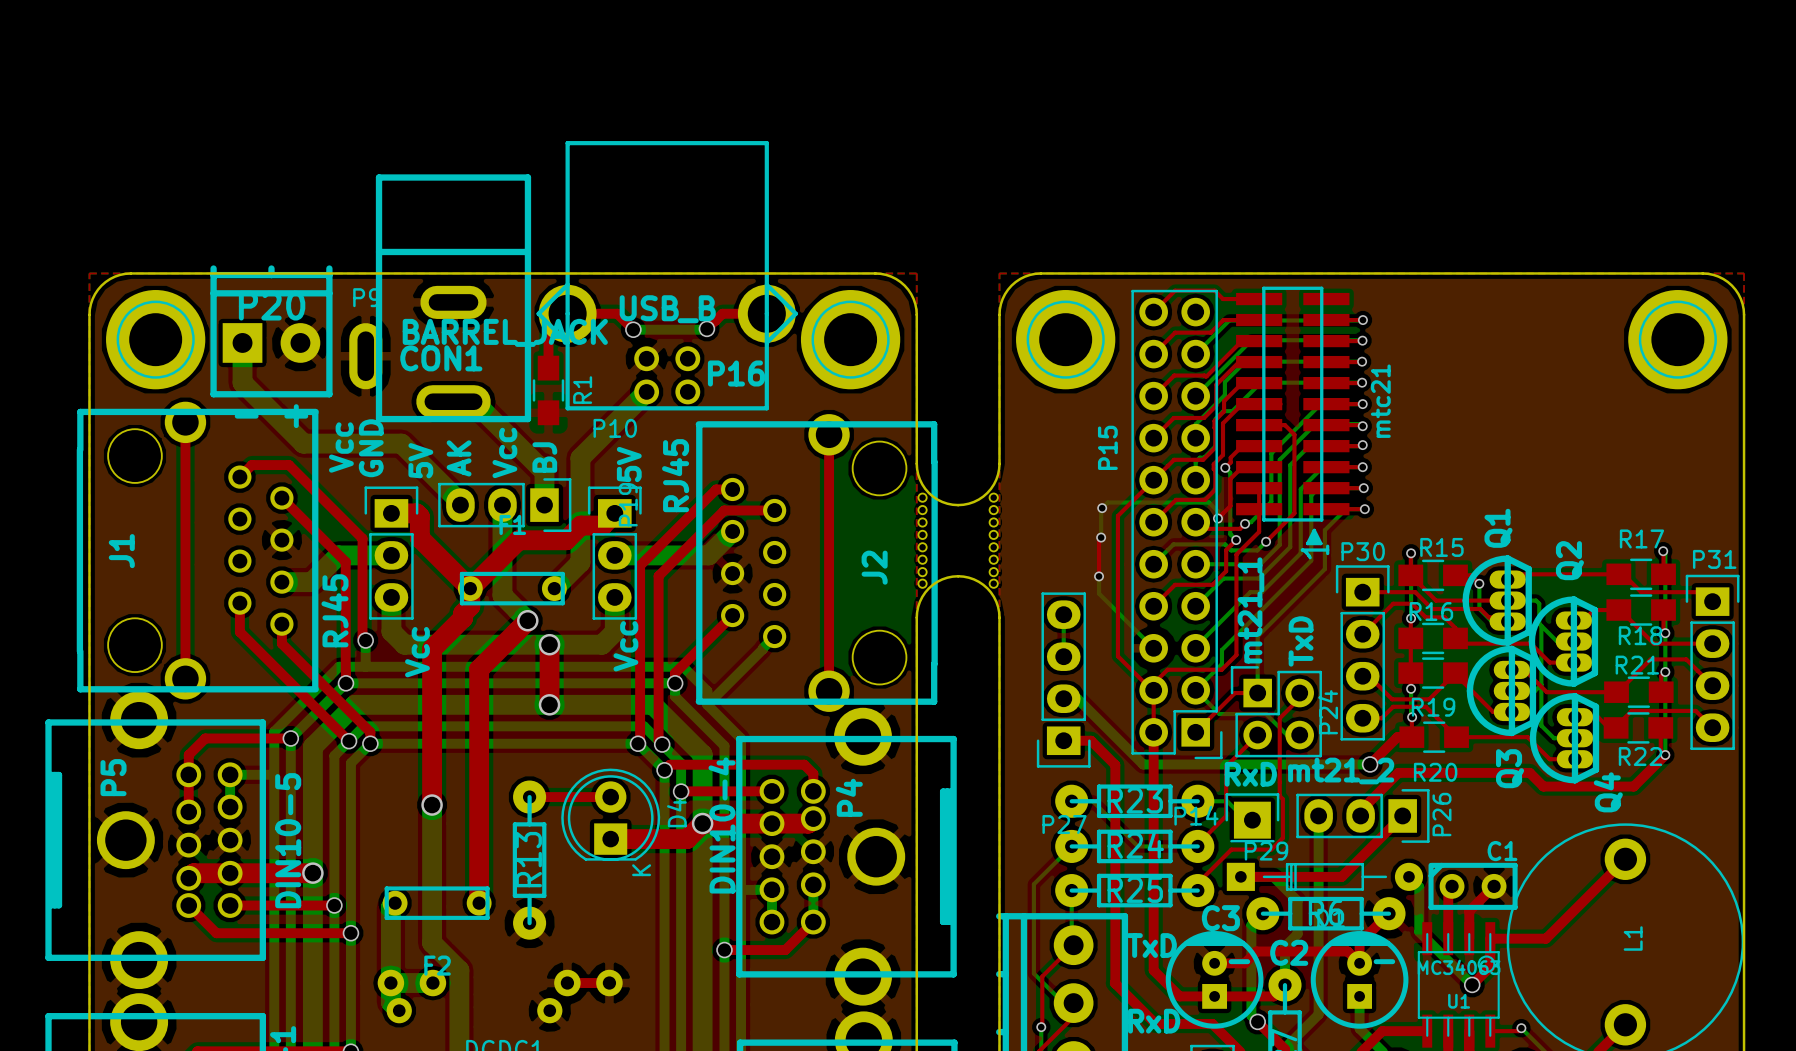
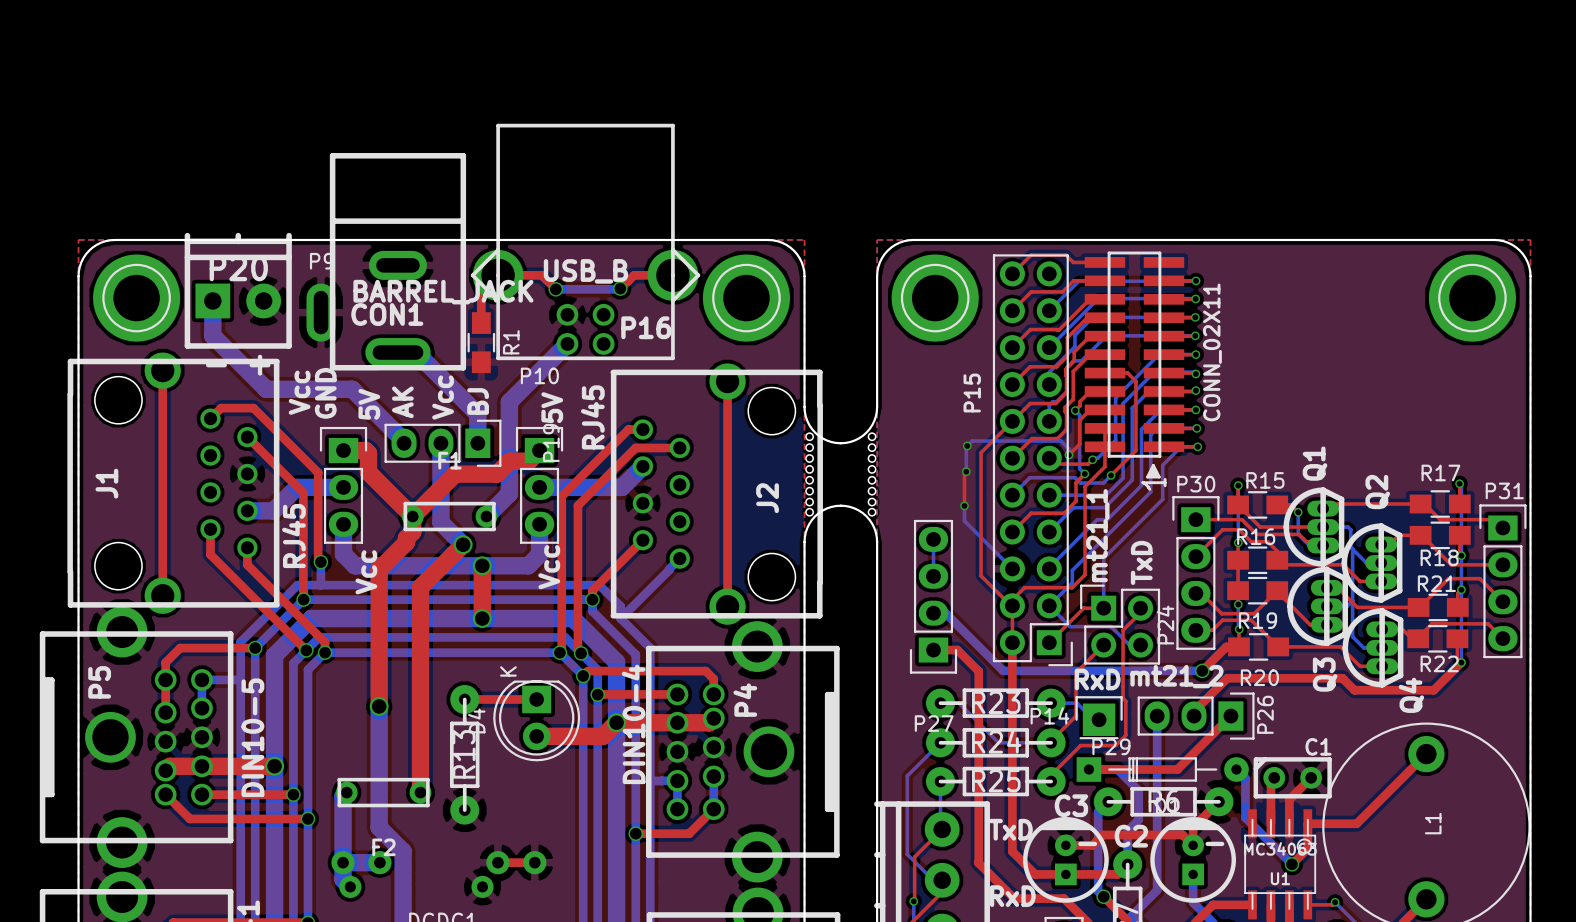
P15 value: mtc21 (1380, 401) -> CONN_02X11 (1212, 352)
D4 rotation: 0° (610, 814) -> 180° (536, 720)

